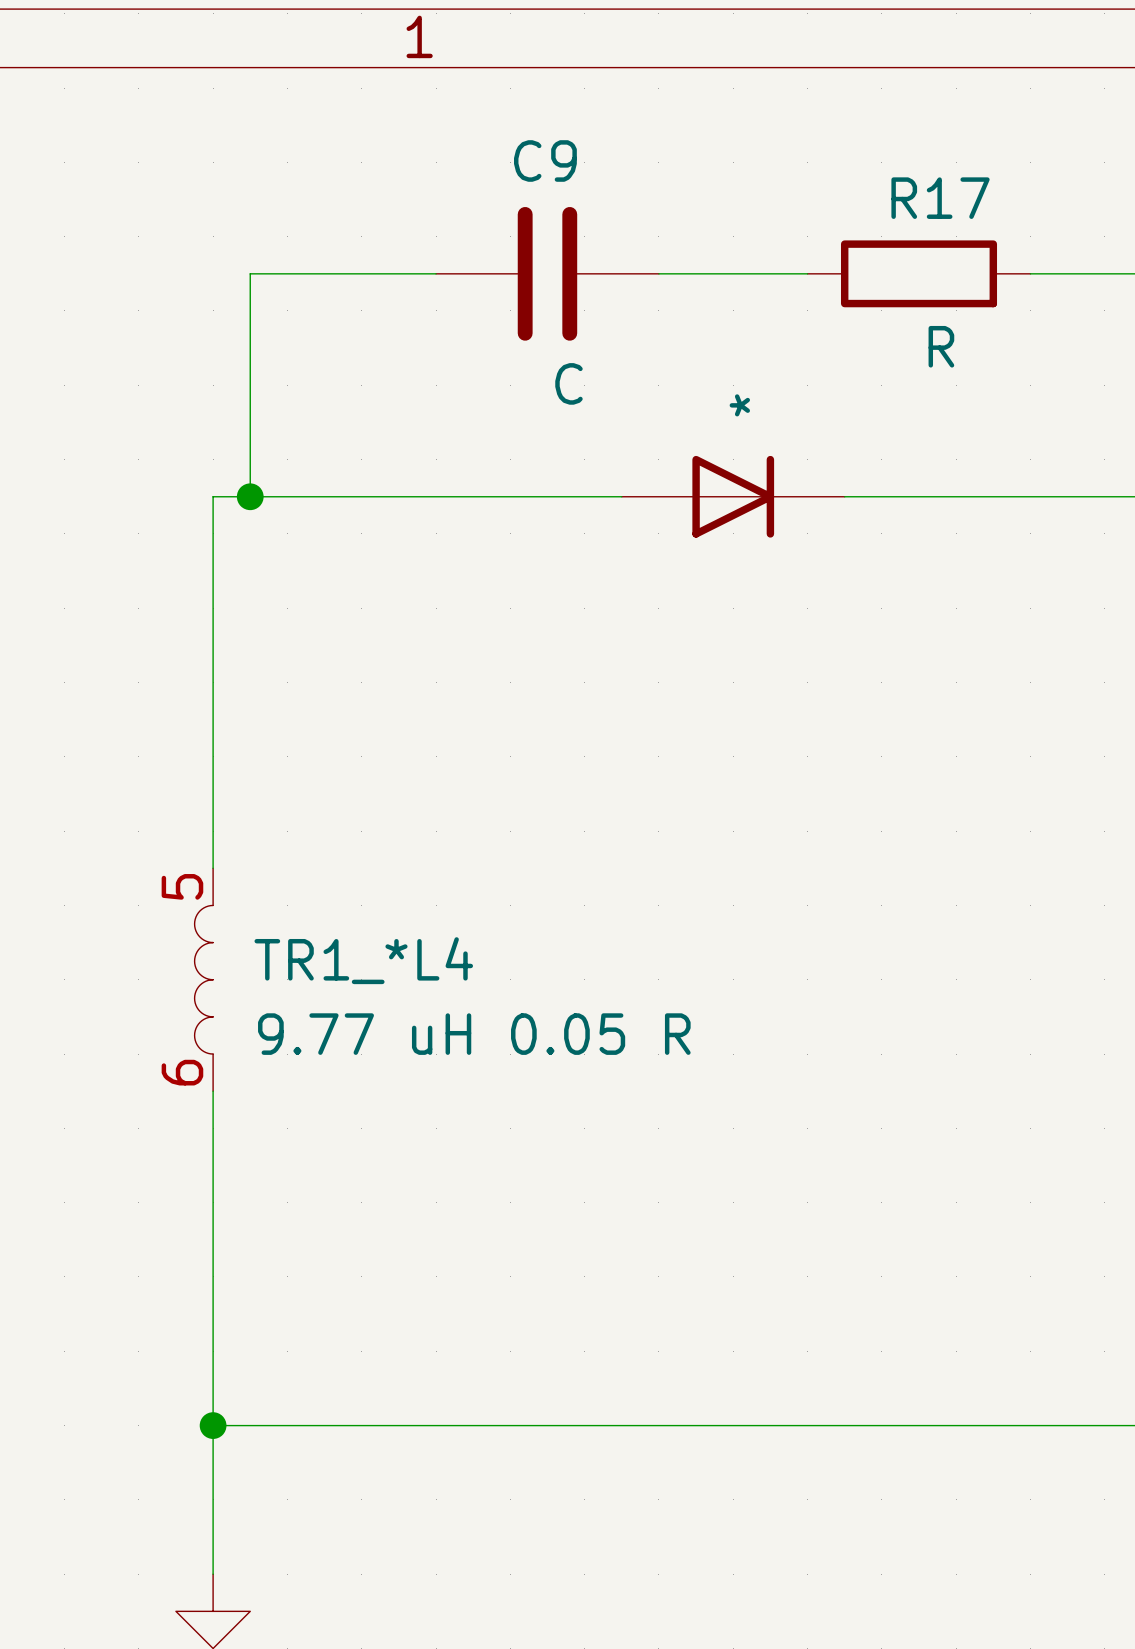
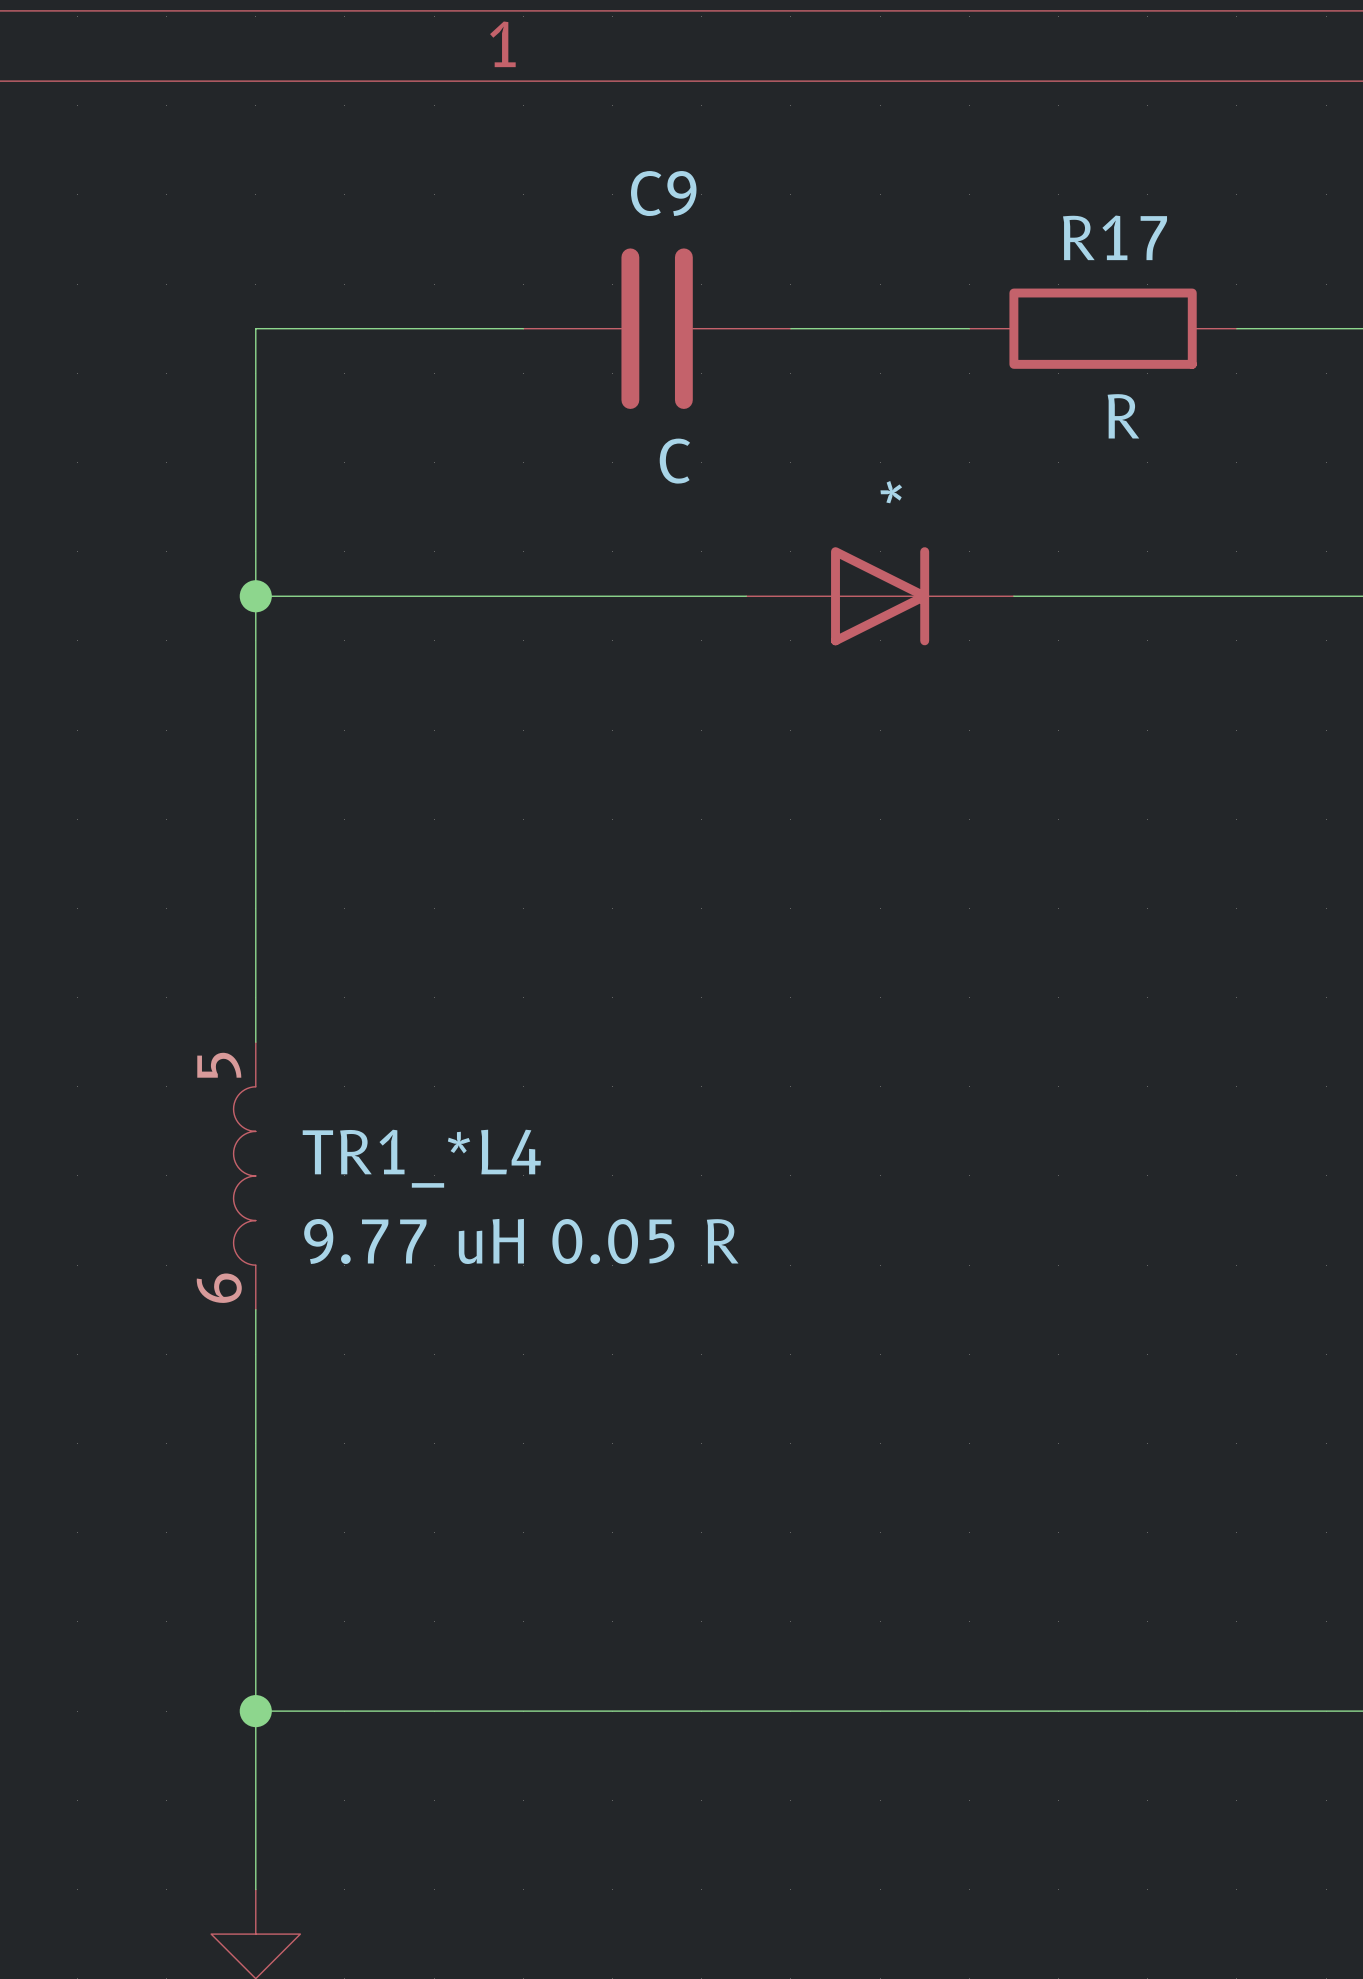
wire: (250, 273) (250, 496) -> (300, 328) (255, 328) (255, 596)
junction position: (250, 496) -> (255, 596)

